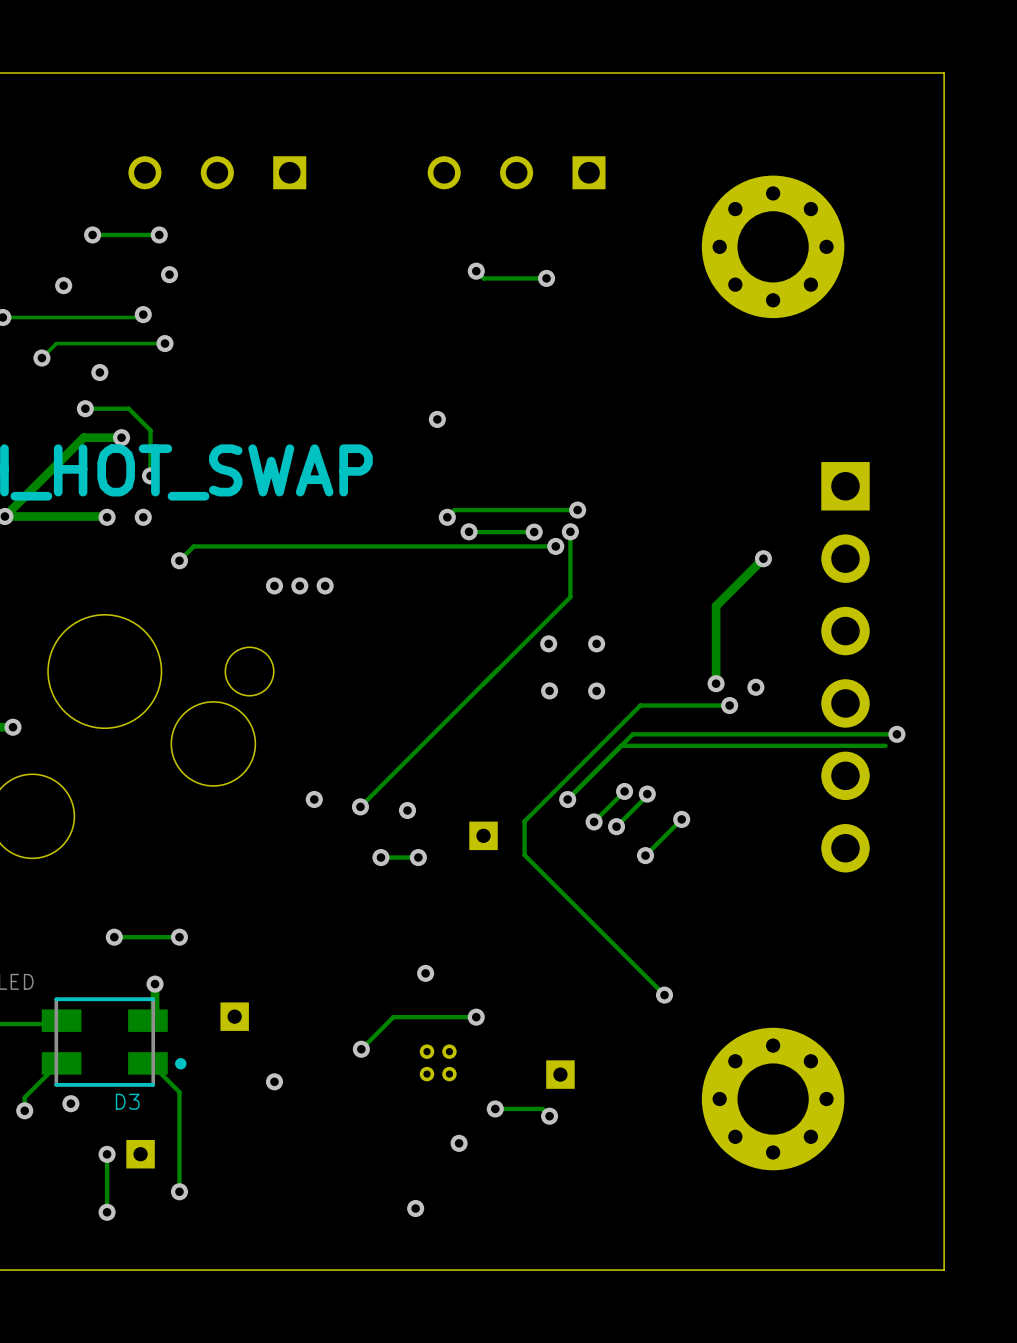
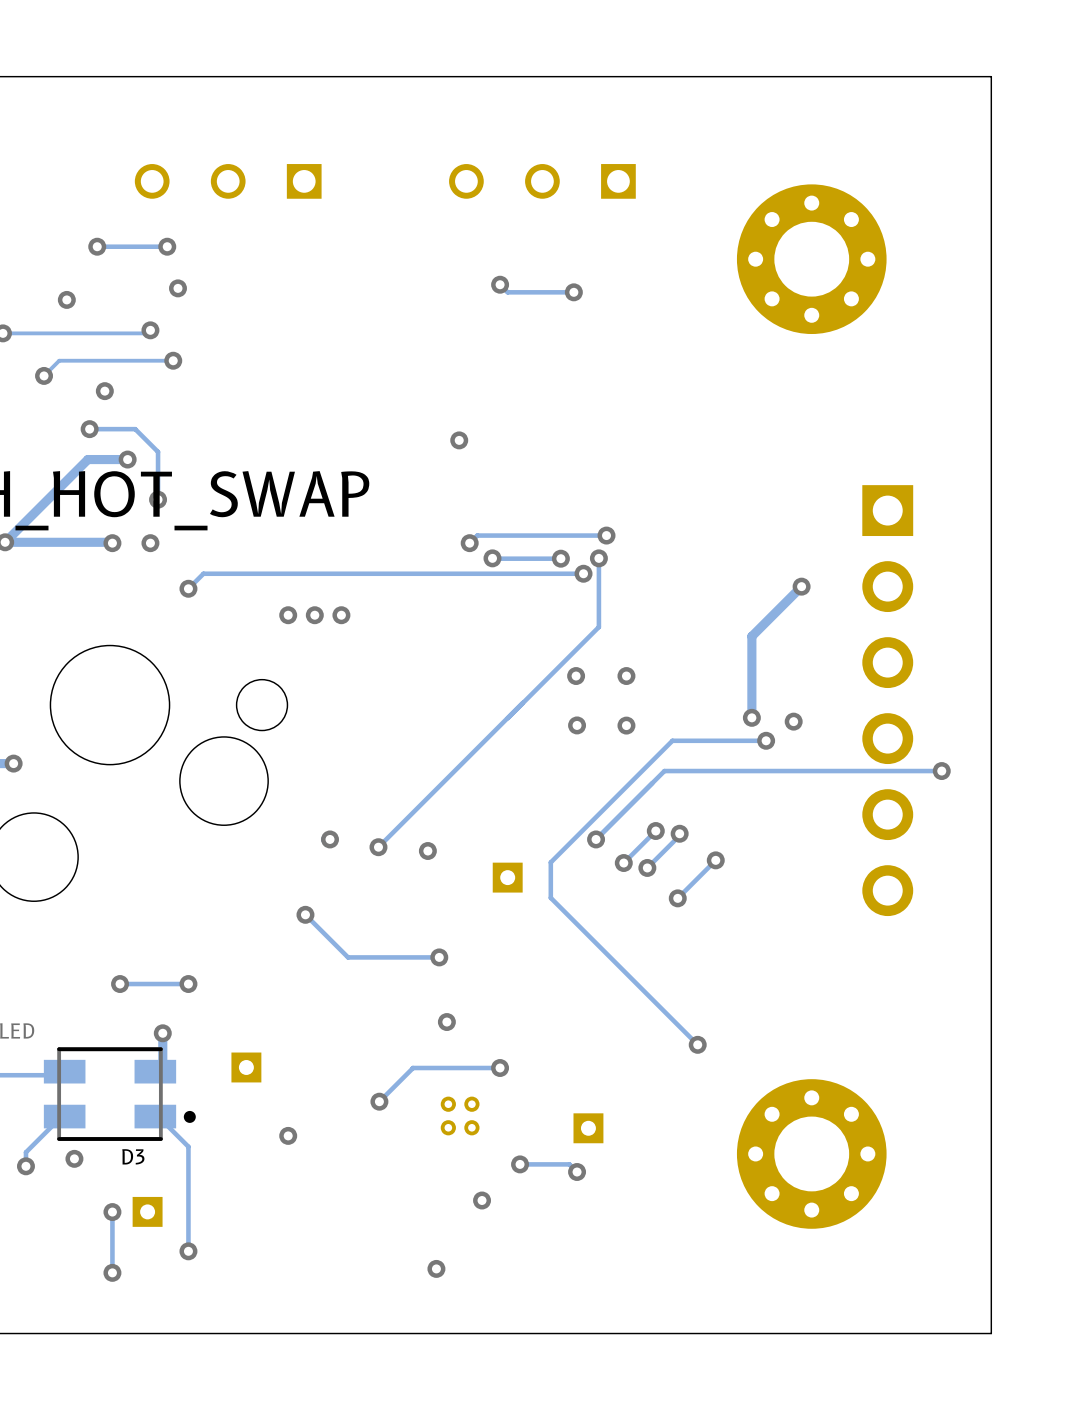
track: (885, 745) (621, 745) -> none
via: (380, 857) -> none
track: (418, 857) (380, 857) -> none
via: (418, 857) -> none
track: none -> (305, 914) (348, 957) (439, 957)
via: none -> (305, 914)
via: none -> (439, 957)

